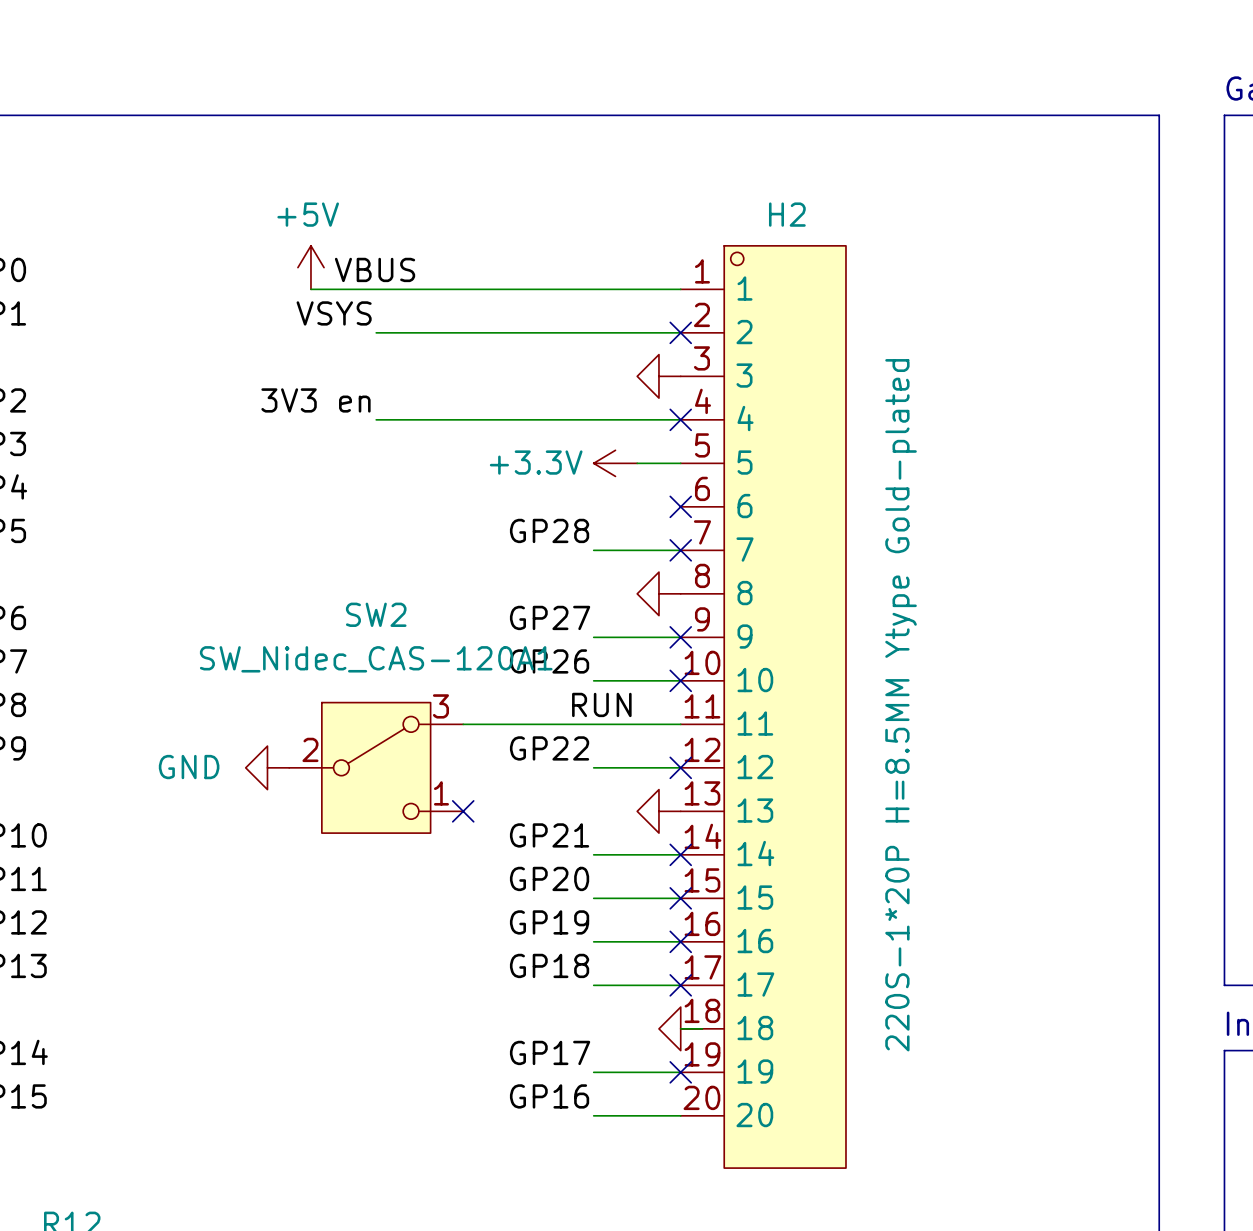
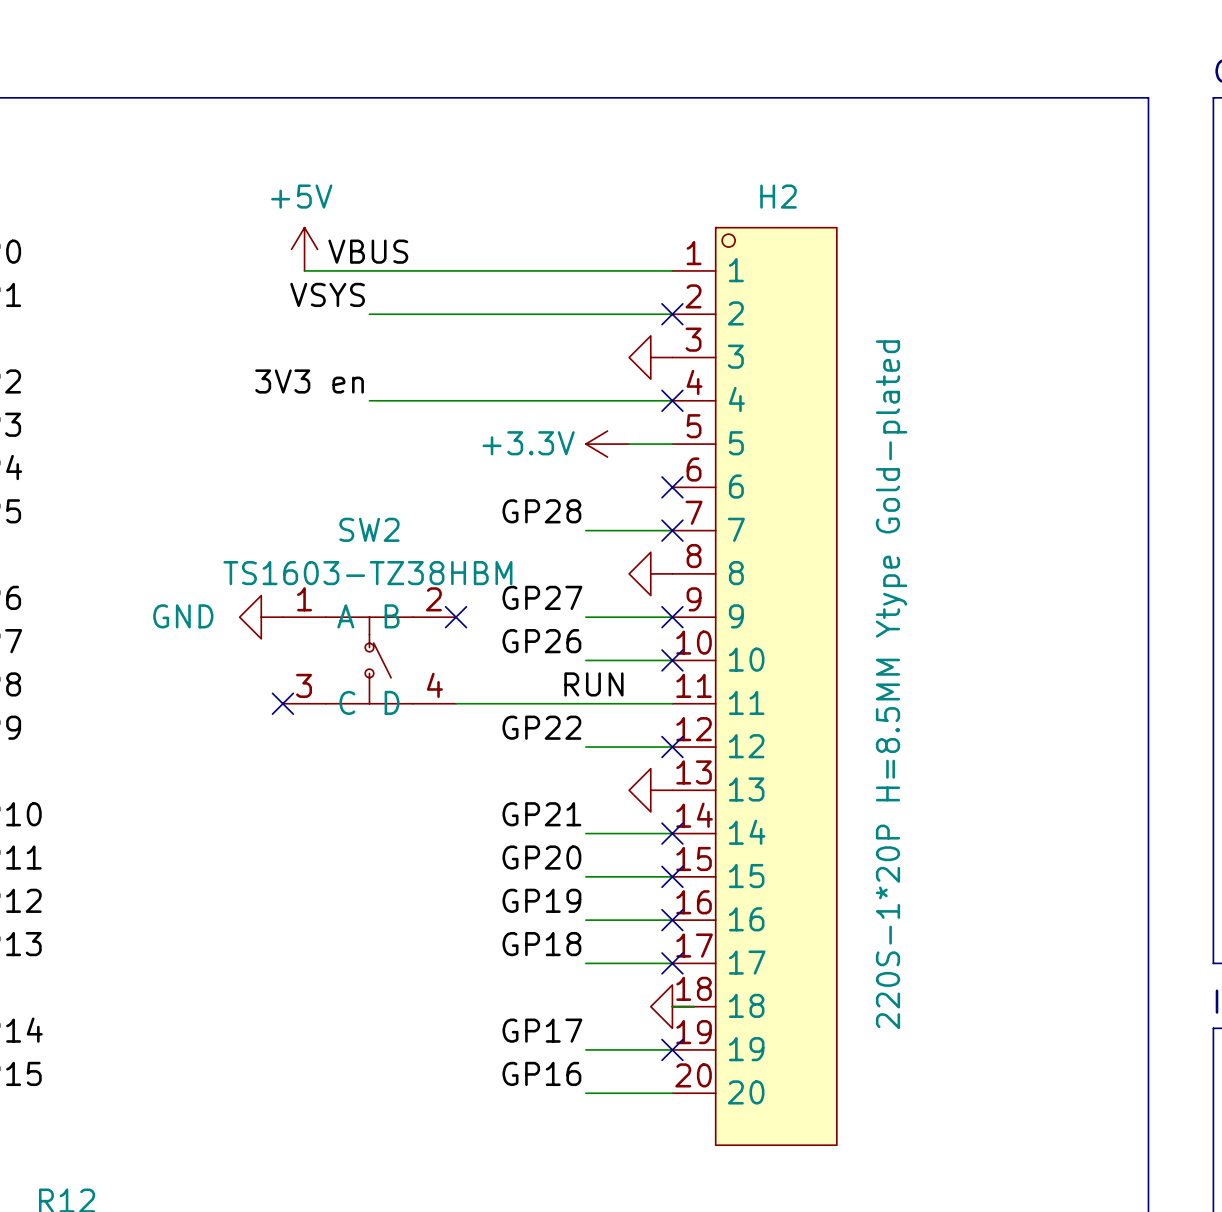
no-connect mark: none -> (456, 617)
SW2 value: SW_Nidec_CAS-120A1 (376, 659) -> TS1603-TZ38HBM (367, 573)
SW2 symbol: [289, 702, 464, 834] -> [282, 617, 457, 704]
no-connect mark: none -> (282, 703)
power symbol position: GND (267, 767) -> GND (261, 617)
no-connect mark: (463, 811) -> none

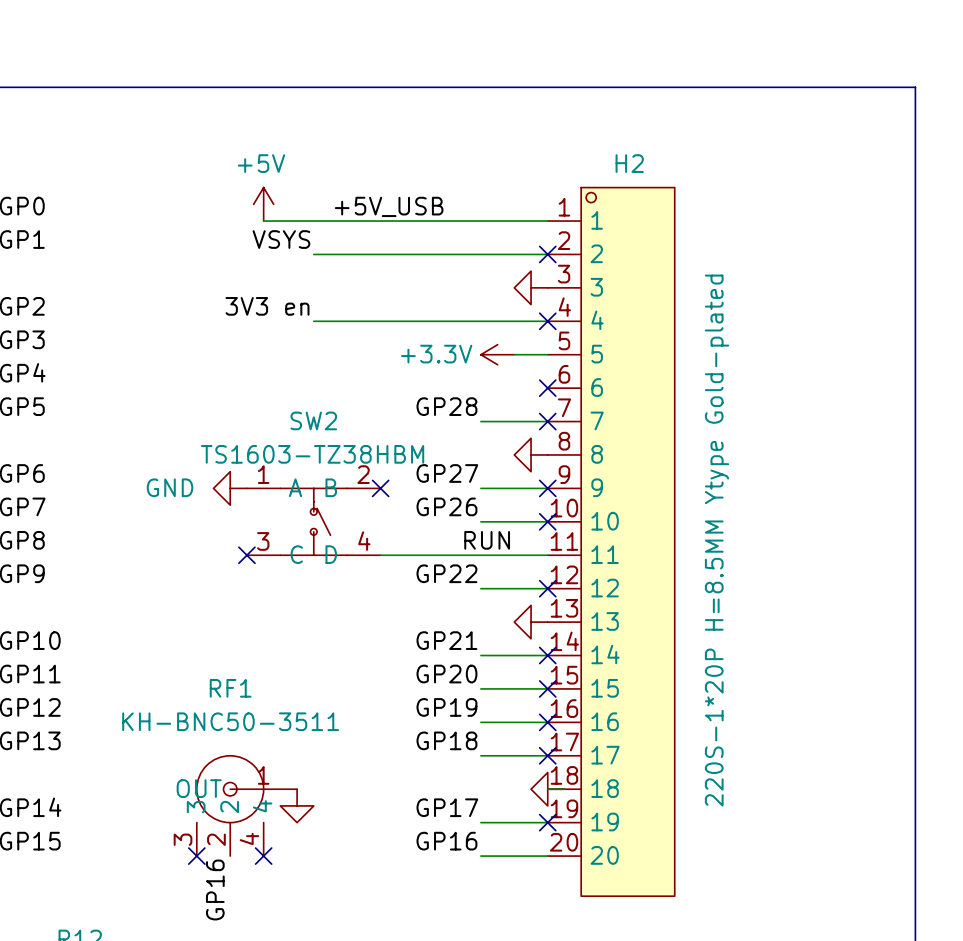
label: VBUS (368, 251) -> none
label: none -> +5V_USB (389, 206)
RF1: none -> KH-BNC50-3511 (246, 805)
power symbol: none -> (297, 805)
no-connect mark: none -> (196, 856)
no-connect mark: none -> (263, 856)
label: none -> GP16 (215, 890)

